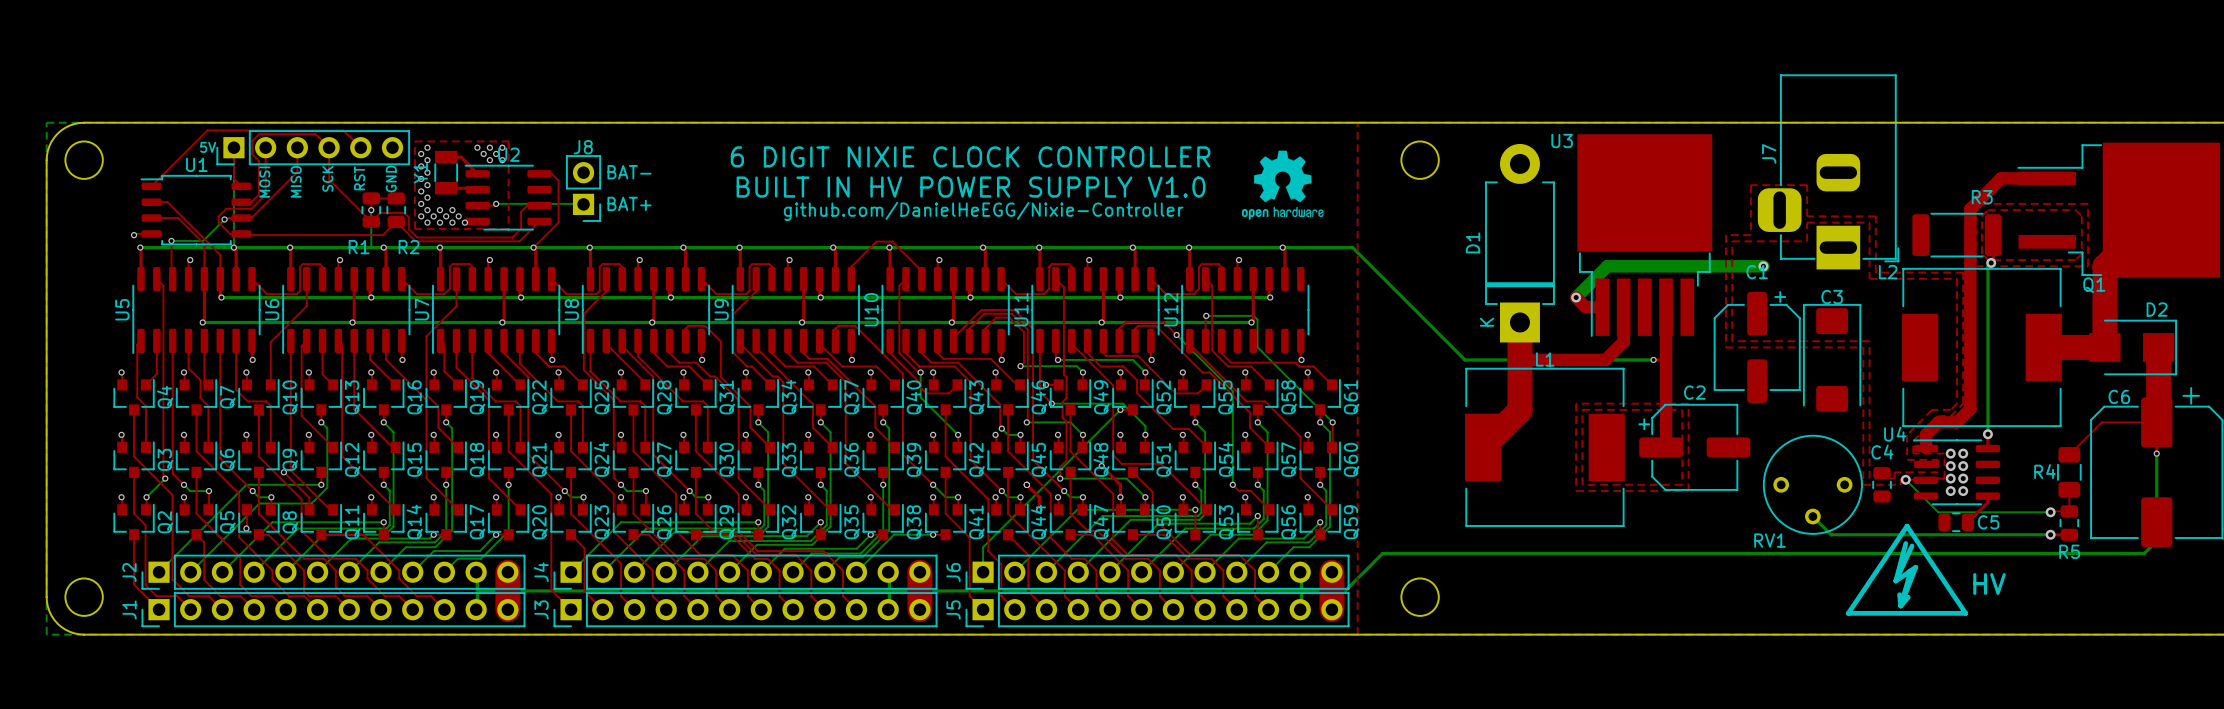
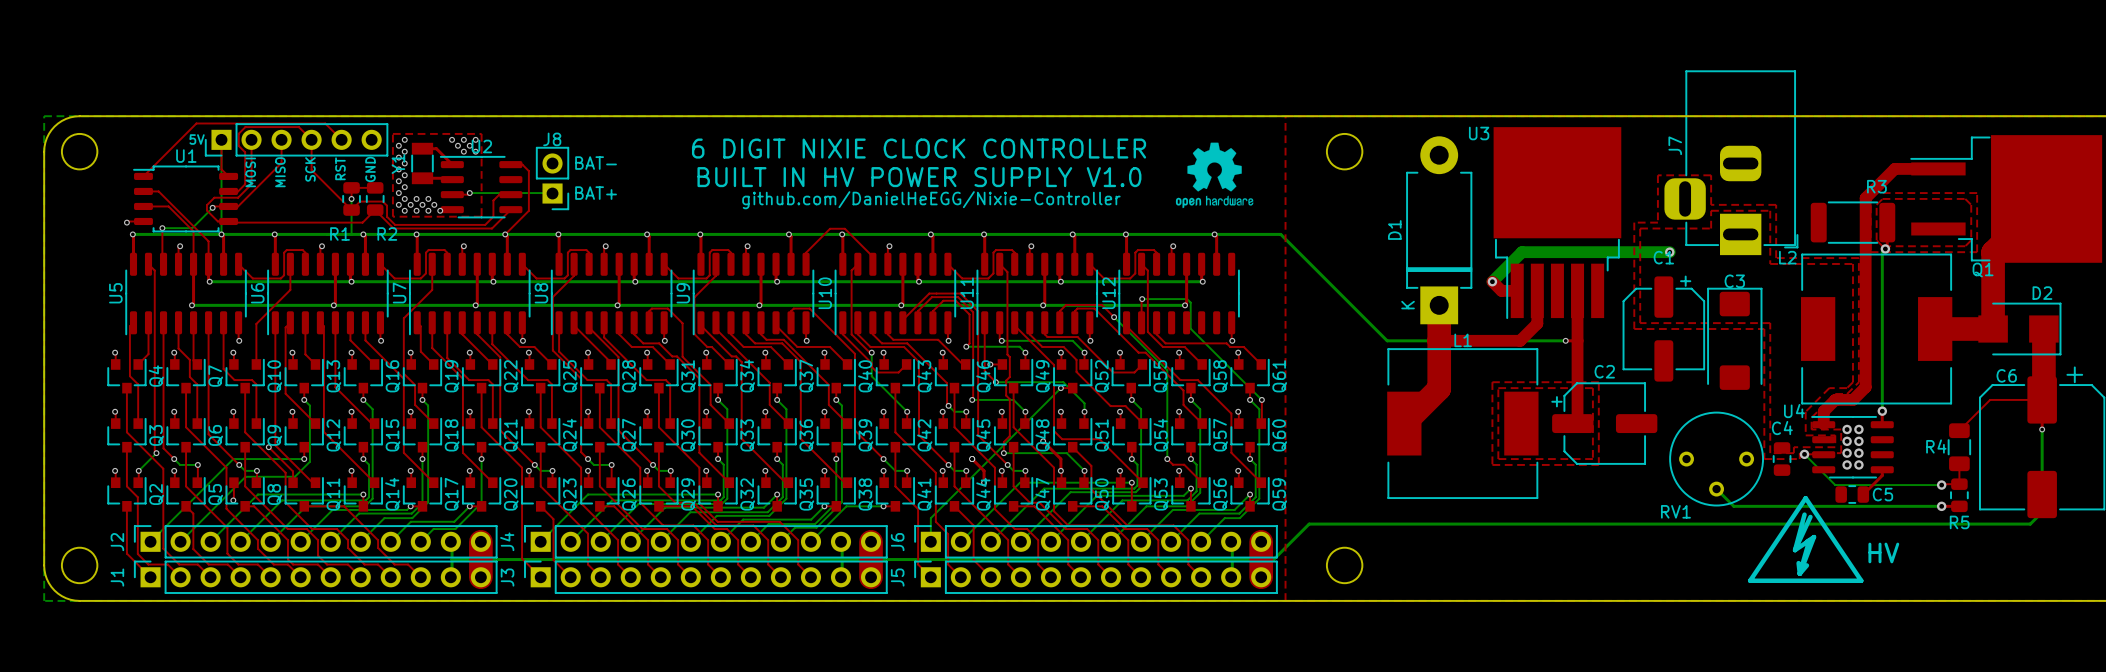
J2 footprint: [141, 554, 526, 590] -> [134, 525, 498, 559]
J4 footprint: [553, 554, 938, 590] -> [524, 525, 888, 559]
J6 footprint: [965, 554, 1350, 590] -> [914, 525, 1278, 559]
J1 footprint: [141, 592, 526, 628] -> [134, 560, 498, 594]
J3 footprint: [553, 592, 938, 628] -> [524, 560, 888, 594]
J5 footprint: [965, 592, 1350, 628] -> [914, 560, 1278, 594]

